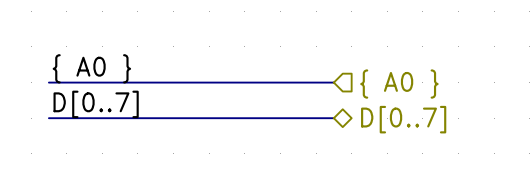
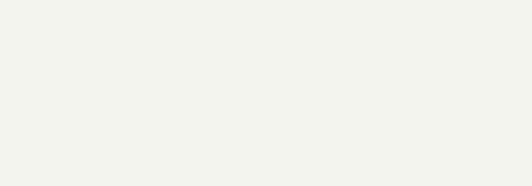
label: { A0 } (91, 68) -> none
bus: (48, 82) (333, 82) -> none
hierarchical label: { A0 } (399, 84) -> none
label: D[0..7] (96, 104) -> none
bus: (48, 118) (333, 118) -> none
hierarchical label: D[0..7] (403, 119) -> none

